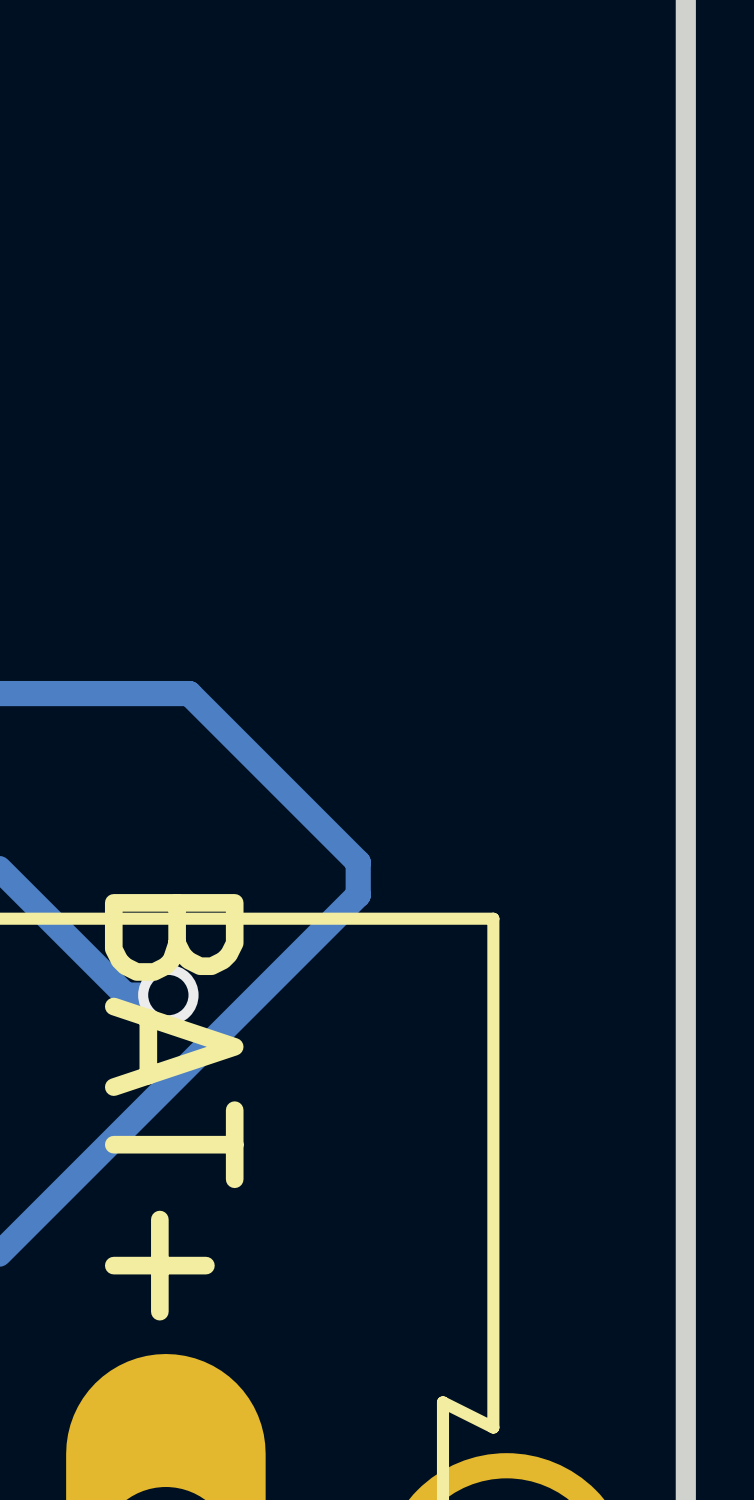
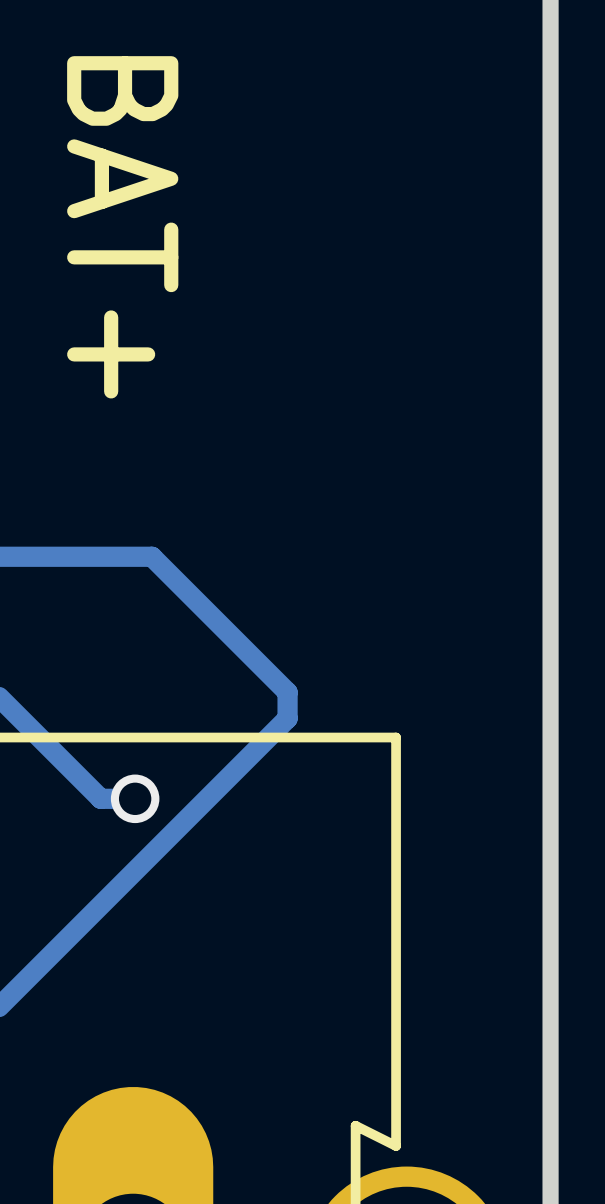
text position: BAT+ (174, 1107) -> BAT+ (122, 227)

